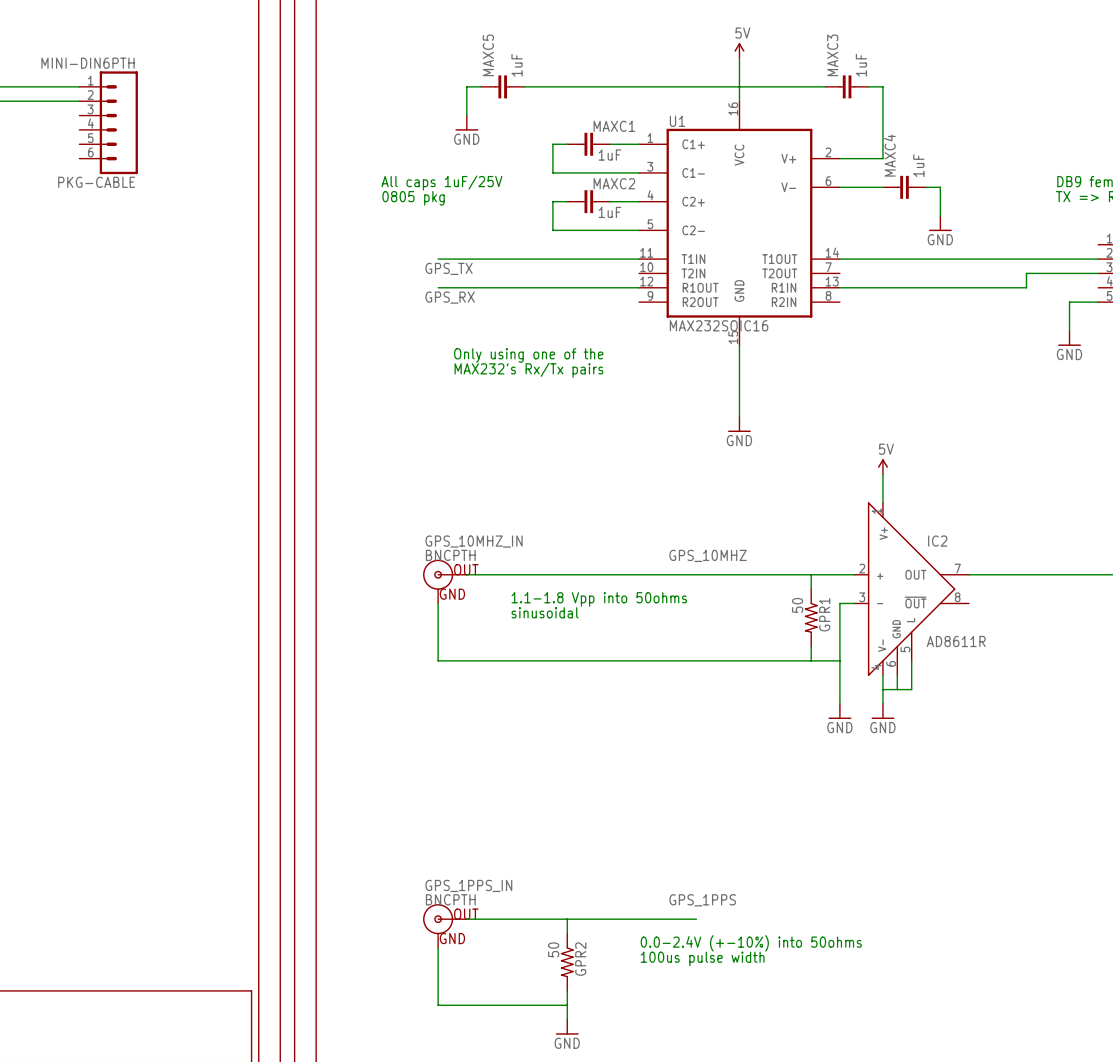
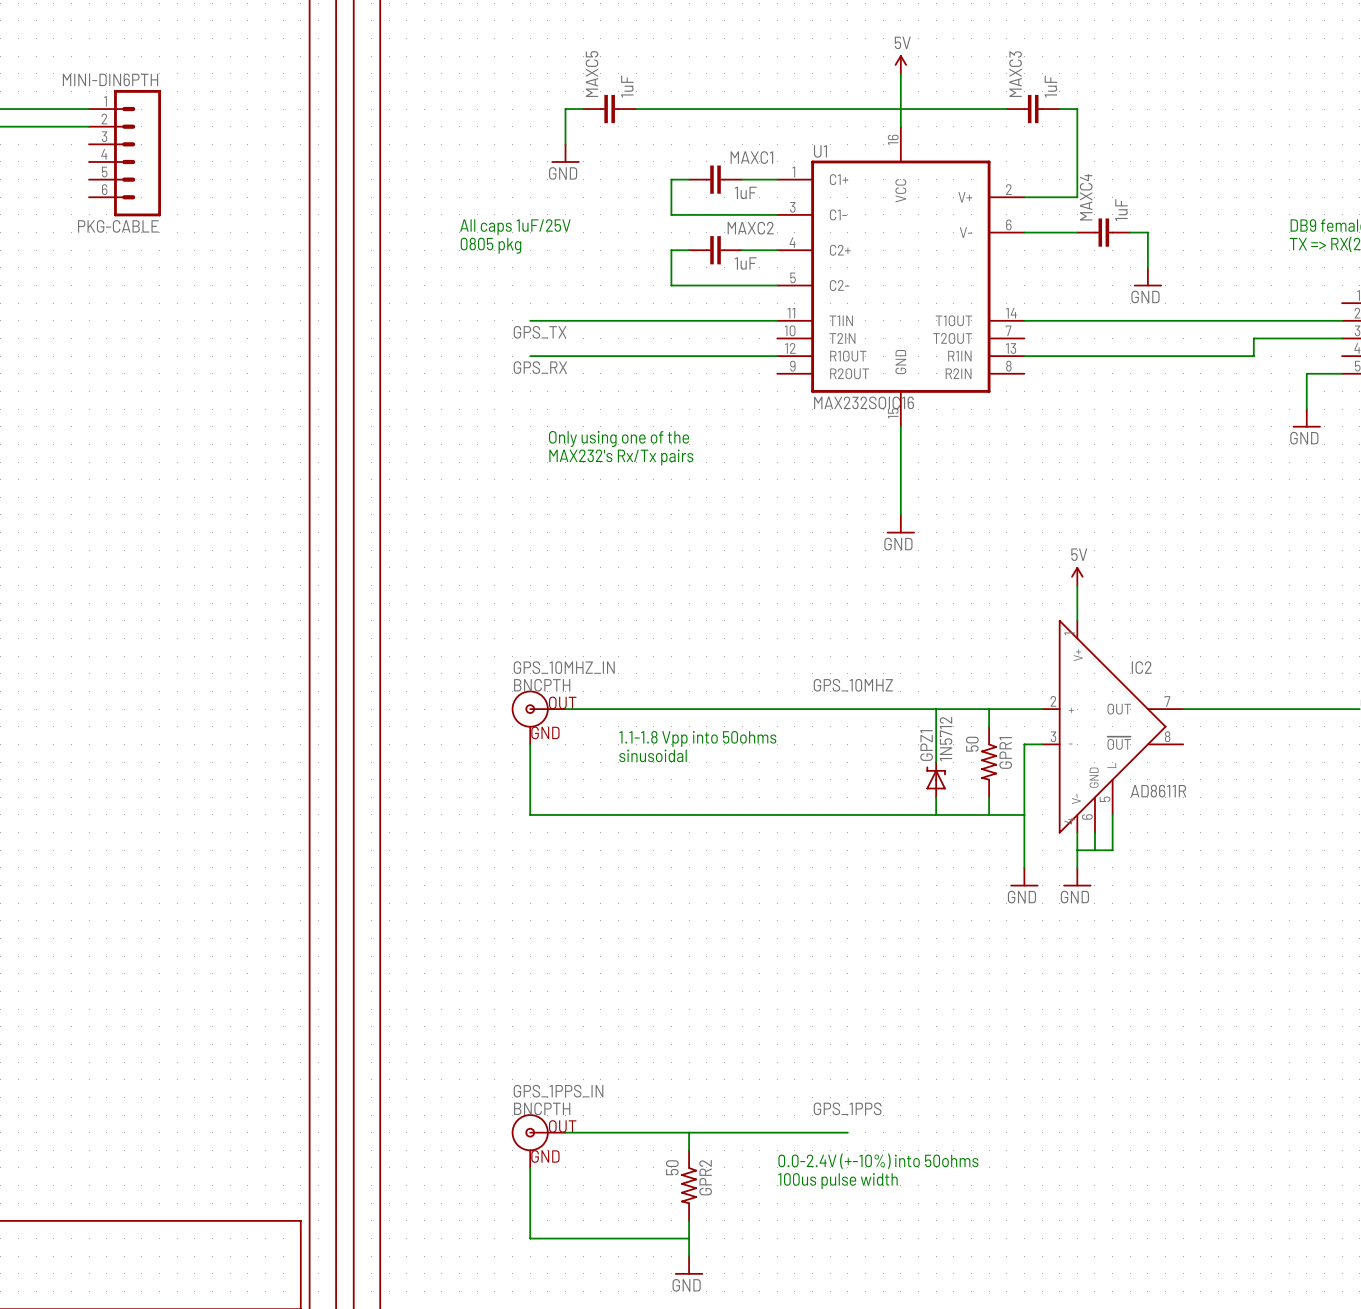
wire: none -> (936, 709) (936, 762)
GPZ1: none -> 1N5712 (936, 779)
wire: none -> (936, 797) (936, 814)

